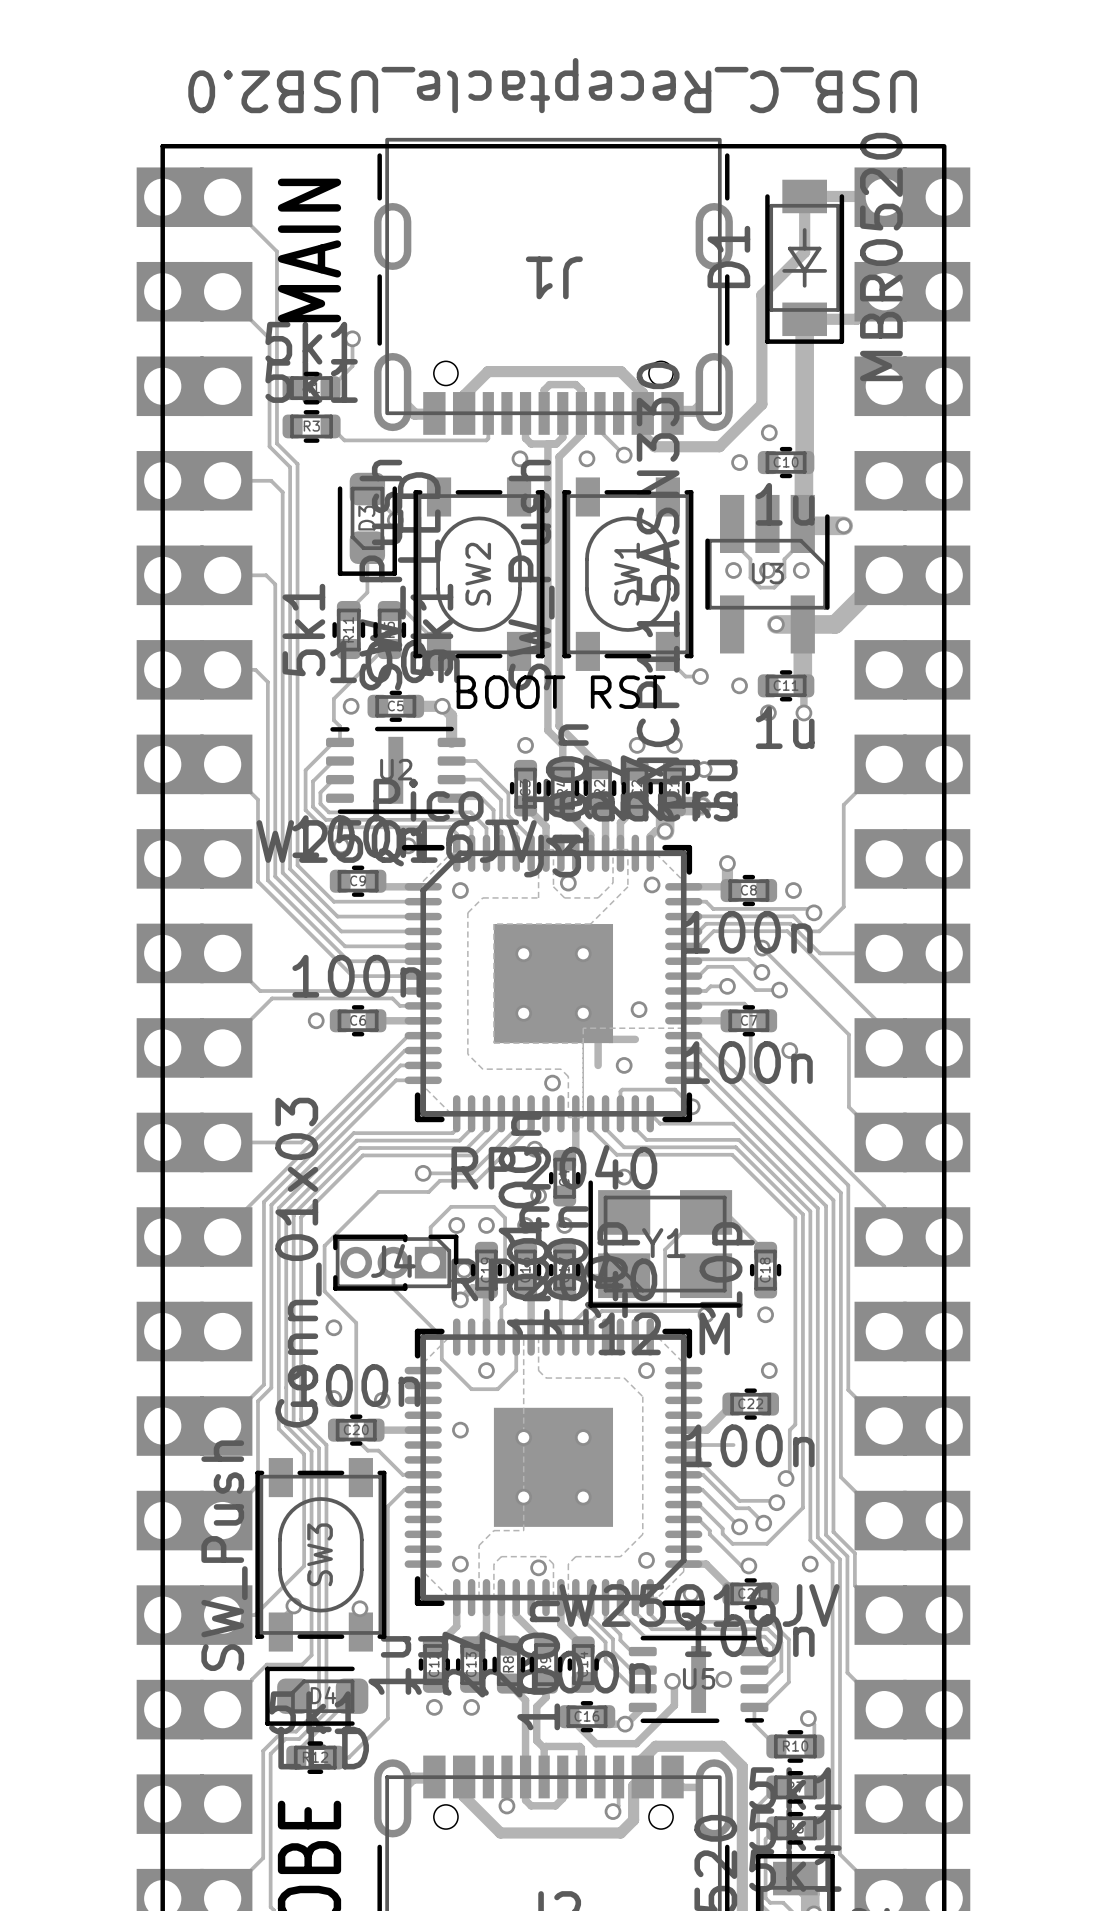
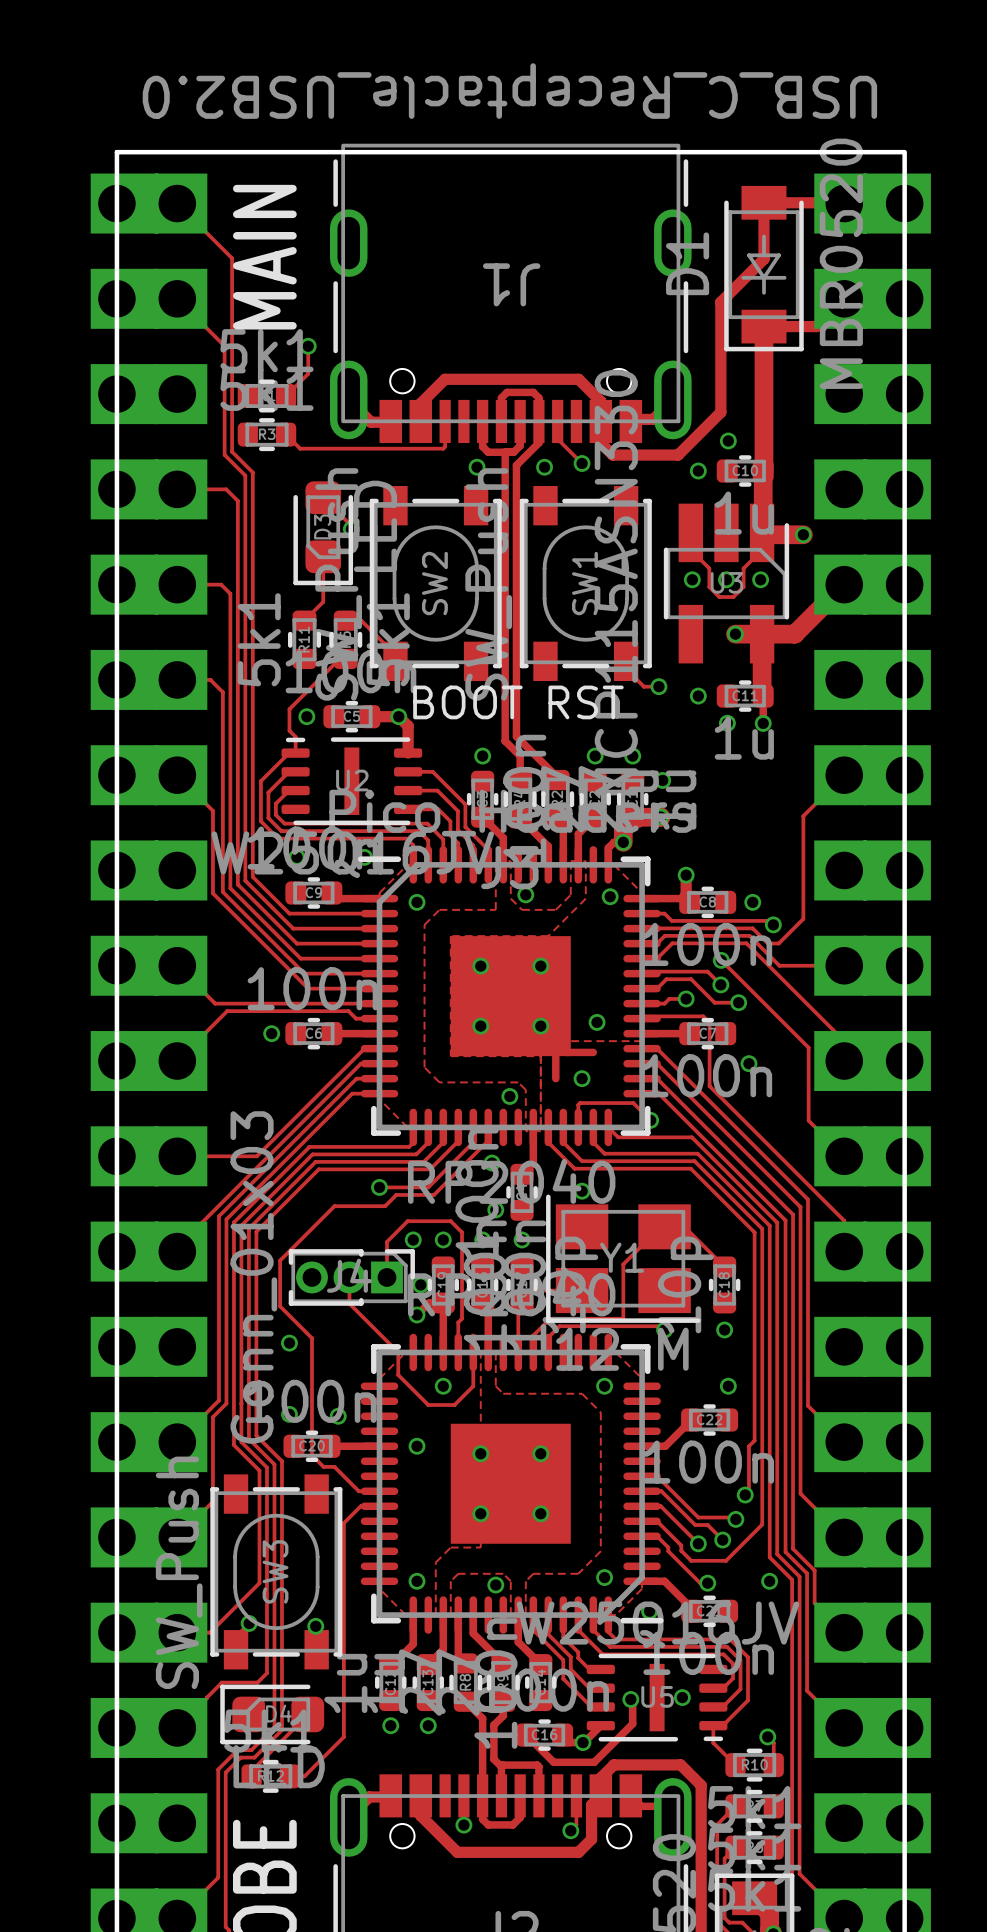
track: (683, 1445) (733, 1445) -> none

